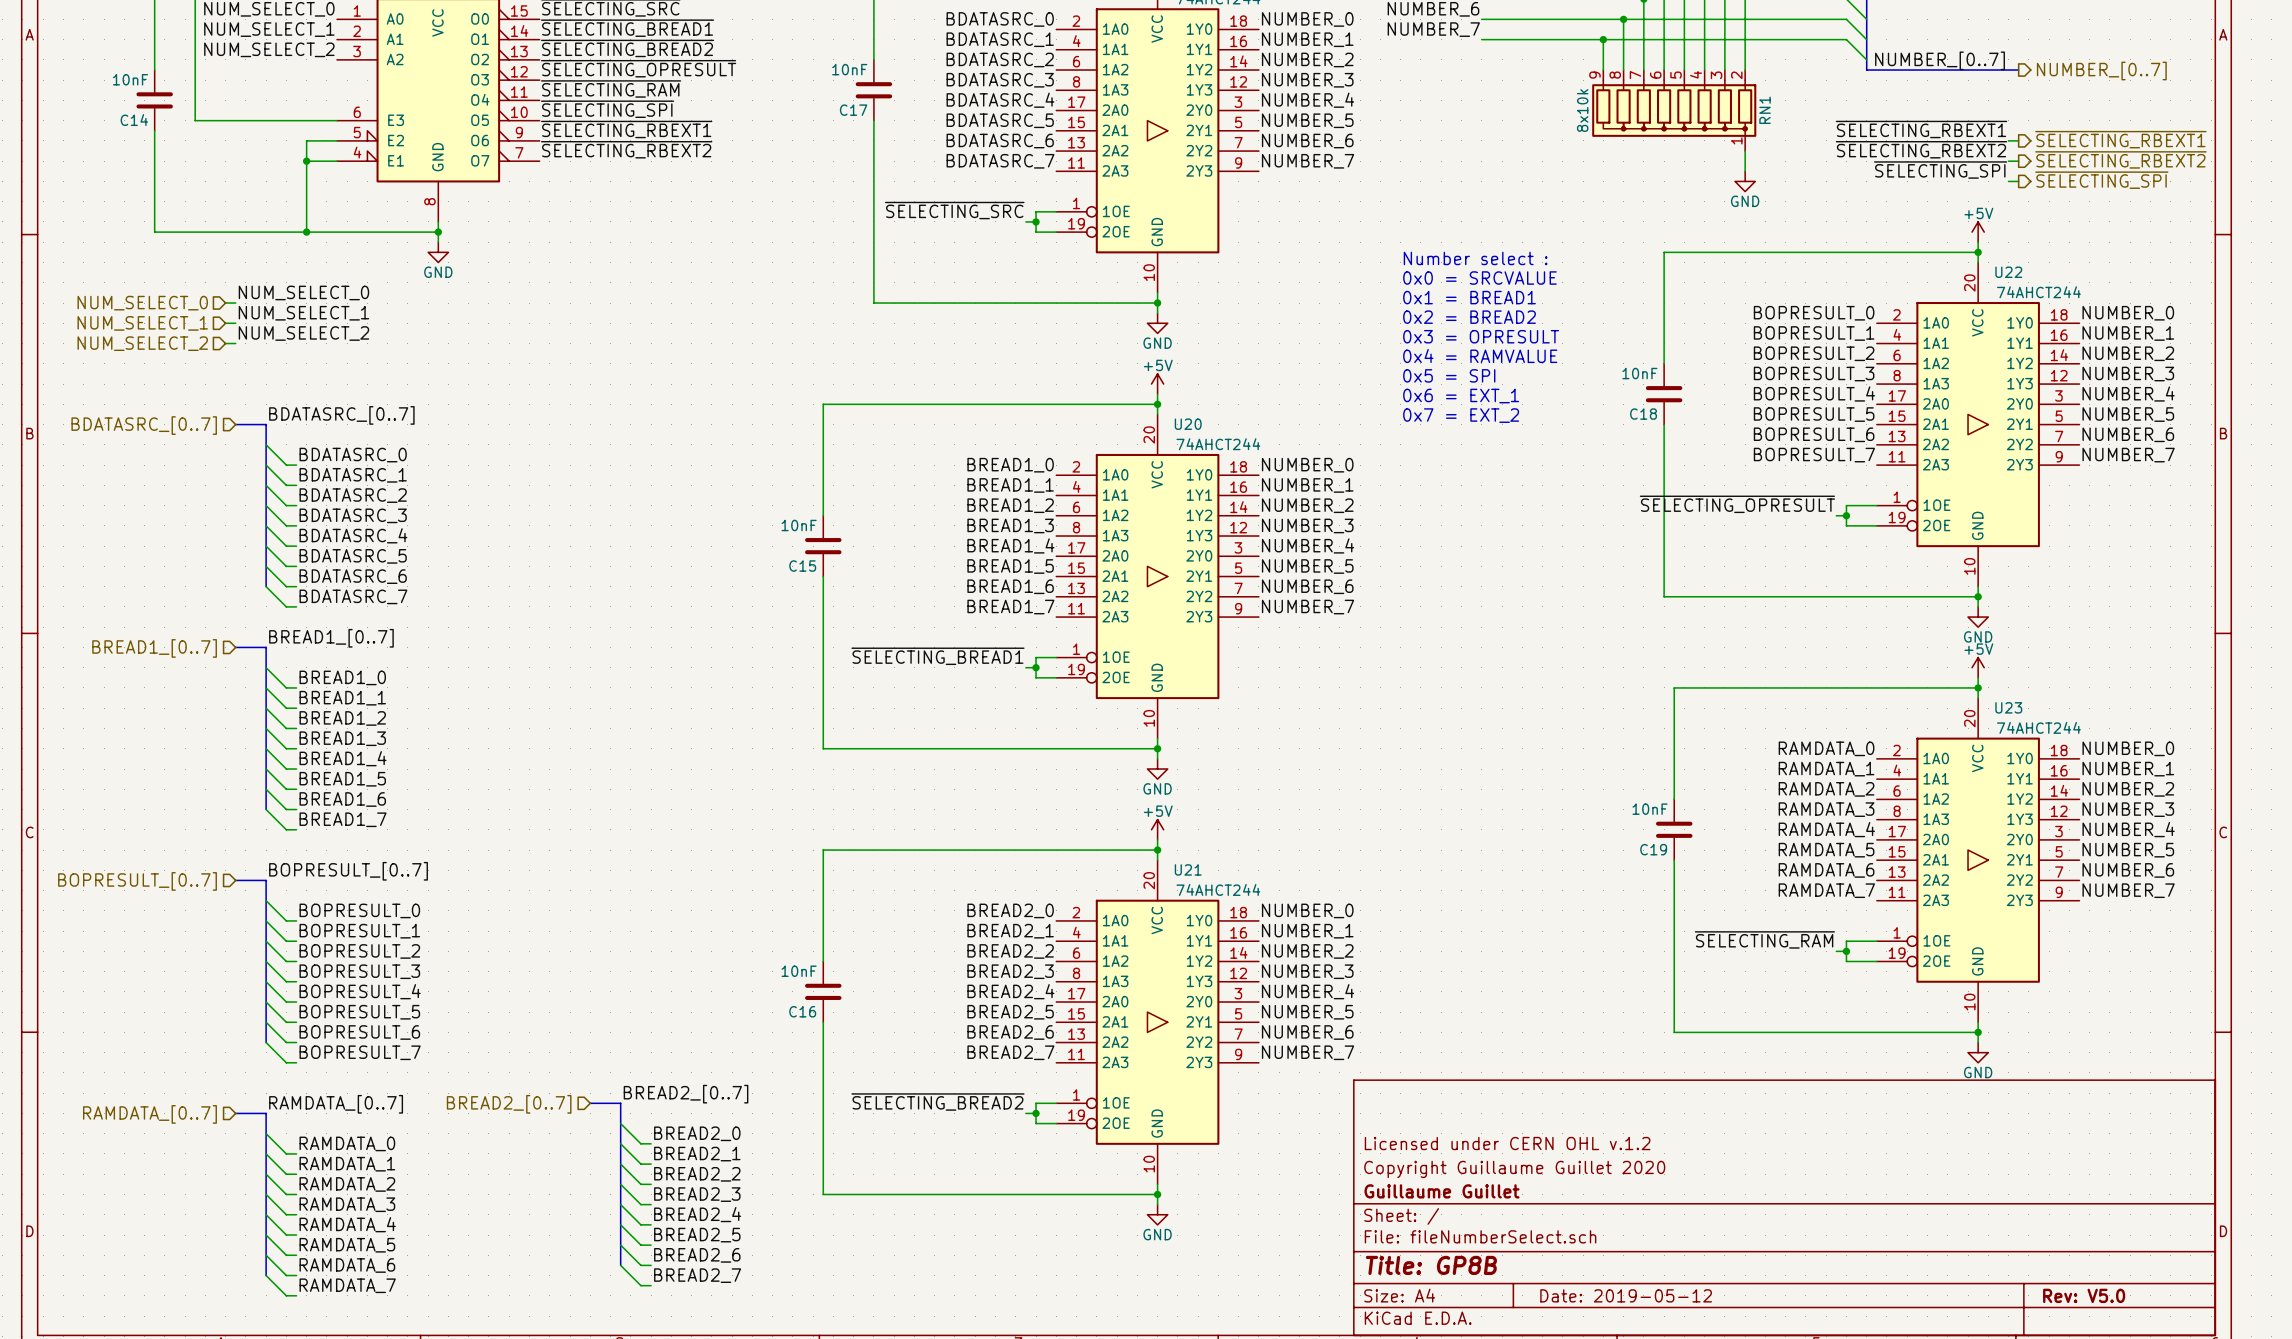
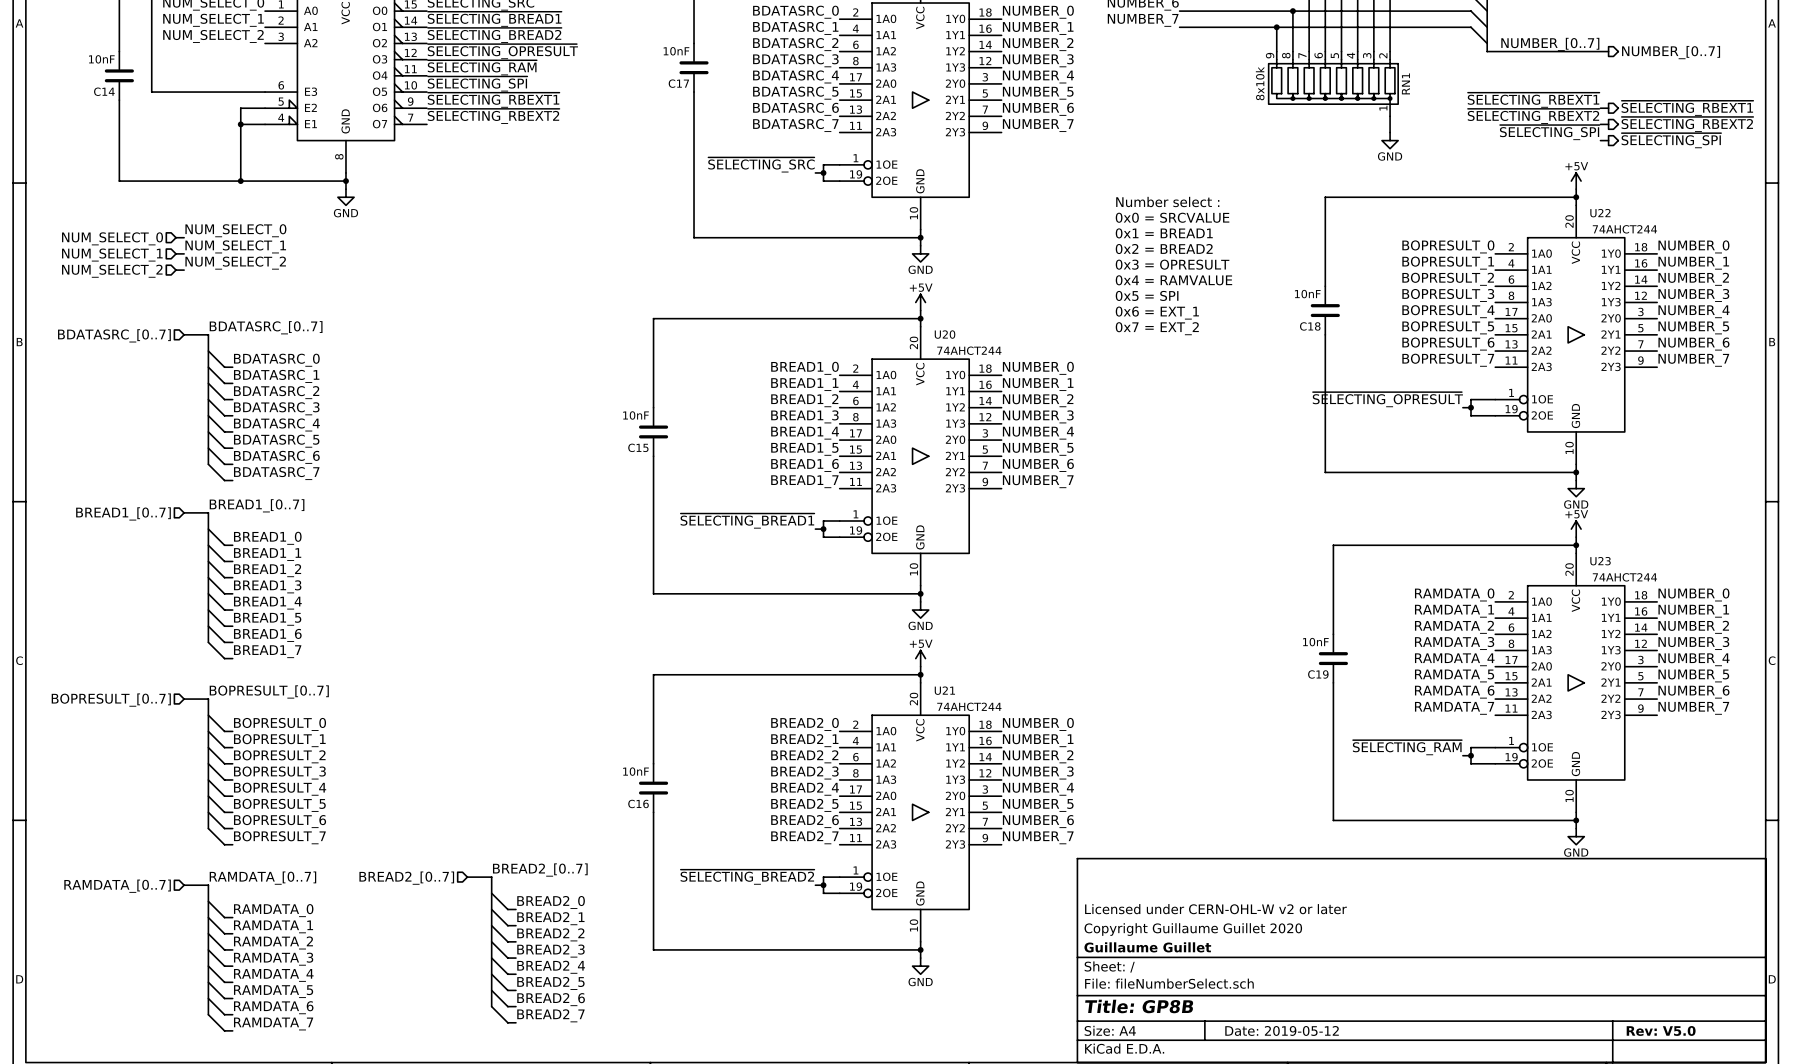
title block: Licensed under CERN OHL v.1.2 (1507, 1143) -> Licensed under CERN-OHL-W v2 or later (1215, 909)

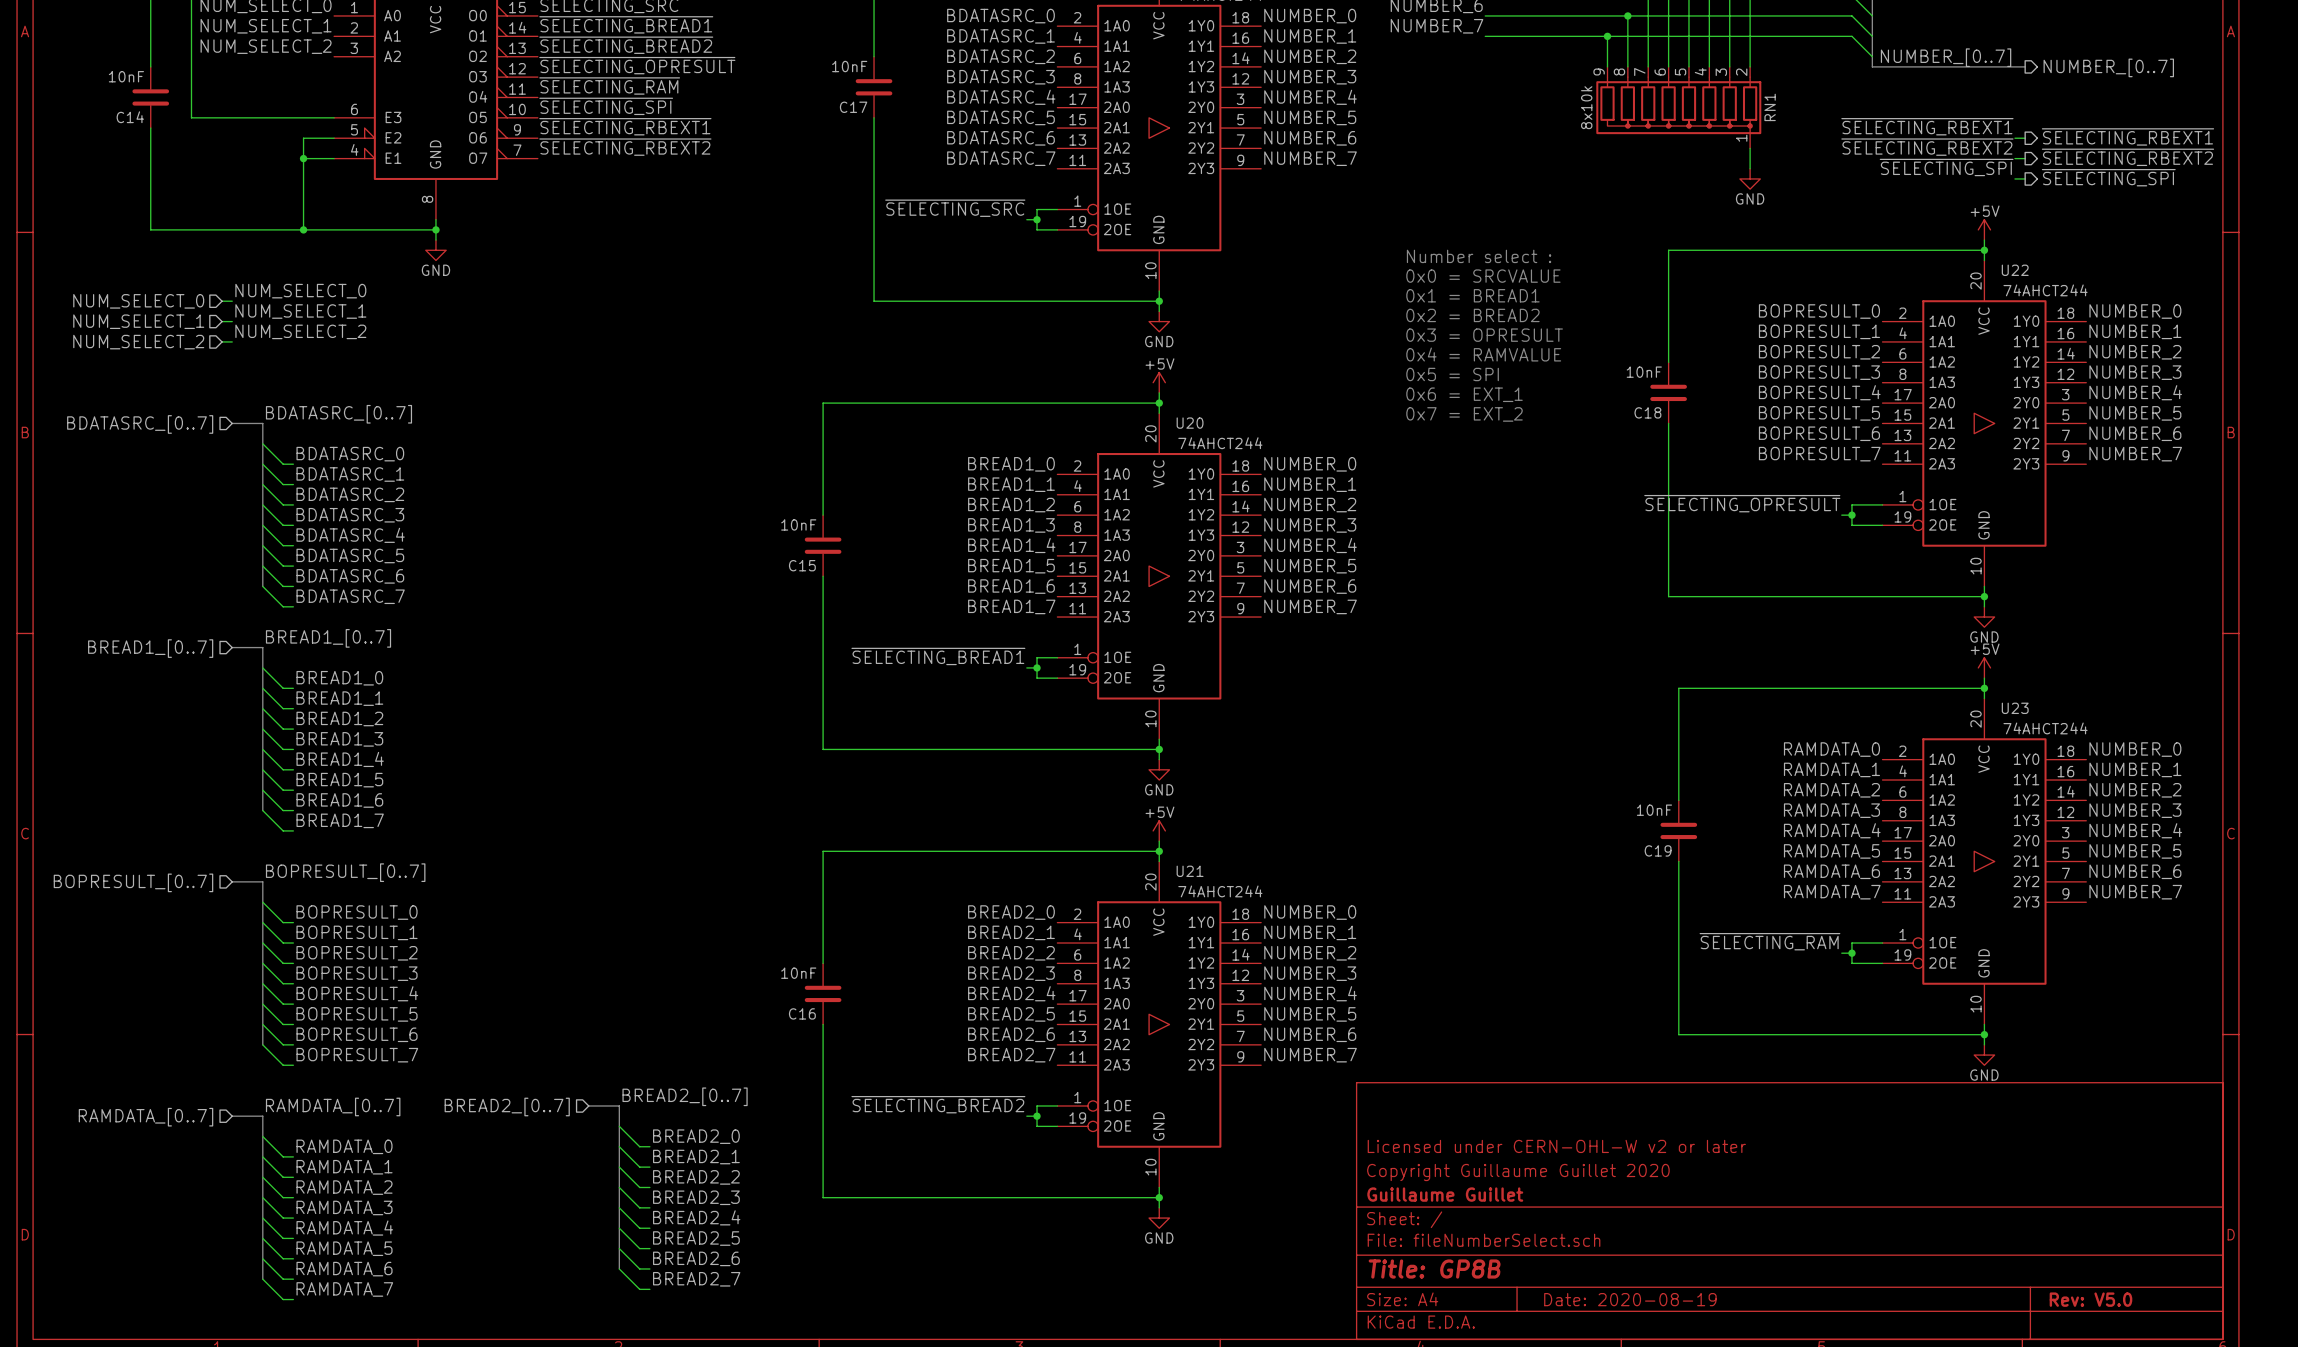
title block: Date: 2019-05-12 (1282, 1030) -> Date: 2020-08-19 (1630, 1299)

